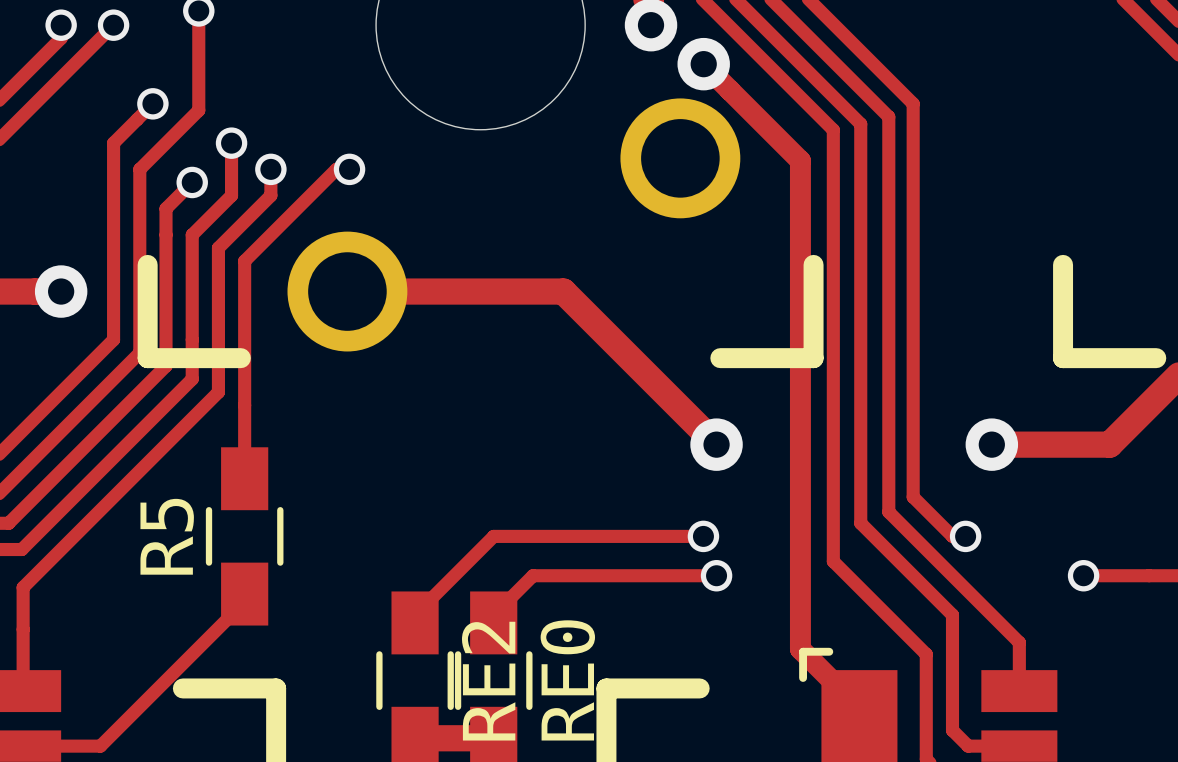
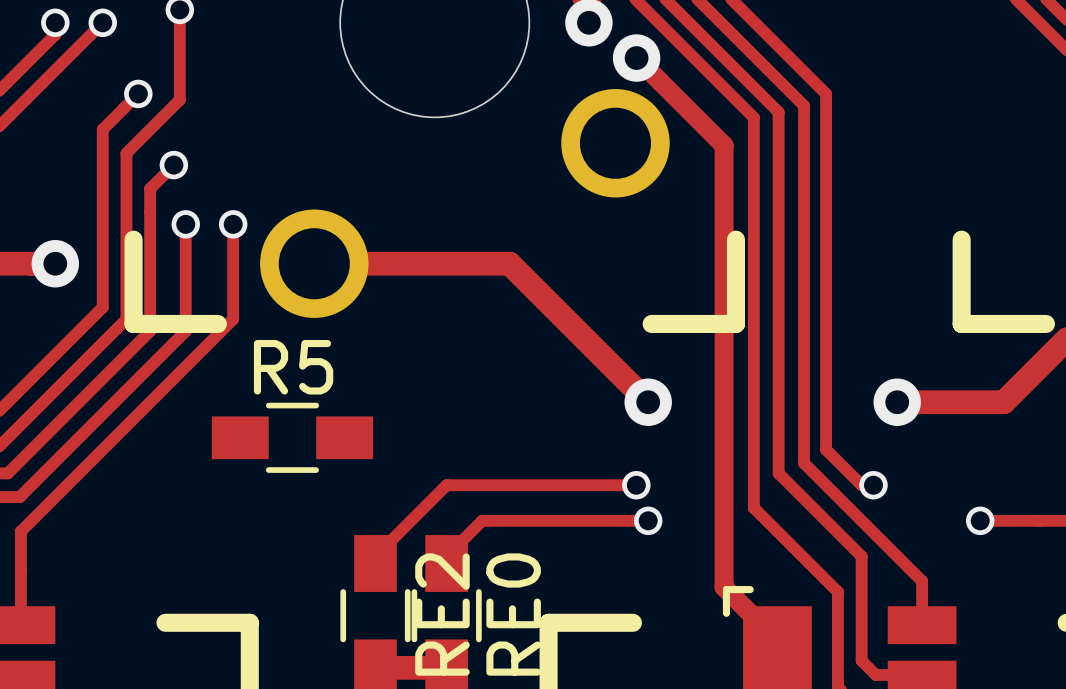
track: (231, 143) (231, 195) (192, 234) (192, 379) -> (185, 224) (185, 331) (173, 342)
via: (231, 143) -> none
track: (270, 169) (270, 195) (218, 248) (218, 392) -> (233, 224) (233, 319) (197, 354)
via: (270, 169) -> none
track: (349, 169) (336, 169) (244, 261) (244, 478) -> none
via: (349, 169) -> none
via: none -> (185, 224)
via: none -> (233, 224)
R5 rotation: 0° (244, 536) -> 90° clockwise (292, 437)
track: (244, 594) (244, 601) (100, 746) (23, 746) -> none

